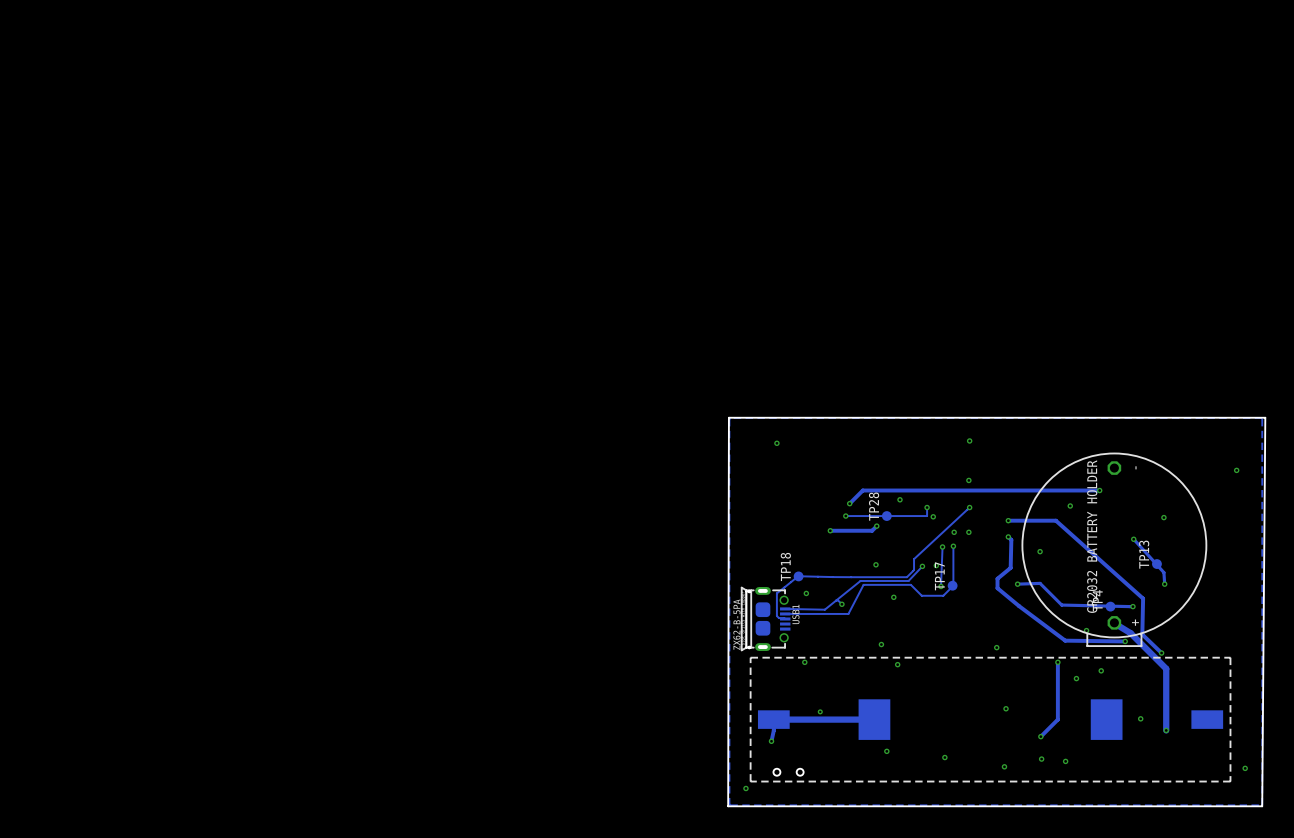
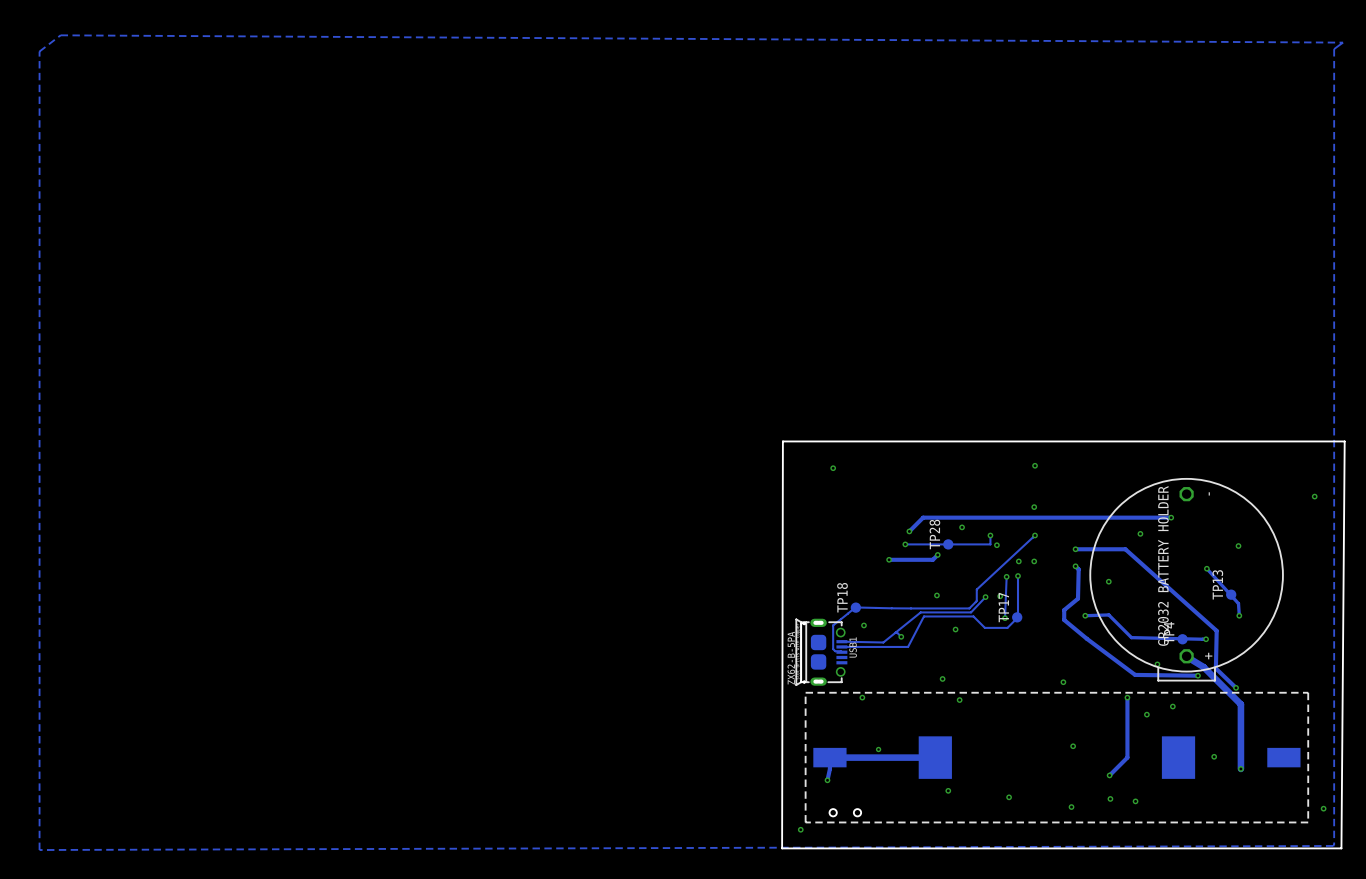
zone outline: none -> (60, 35) (39, 51) (39, 850) (1334, 845) (1334, 49) (1343, 42) (60, 35)
zone outline: (1262, 418) (1262, 805) (729, 804) (730, 418) (1262, 418) -> none

